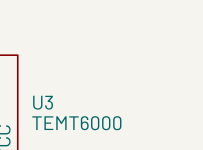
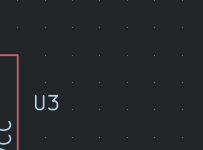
U3 value: TEMT6000 (76, 123) -> none

